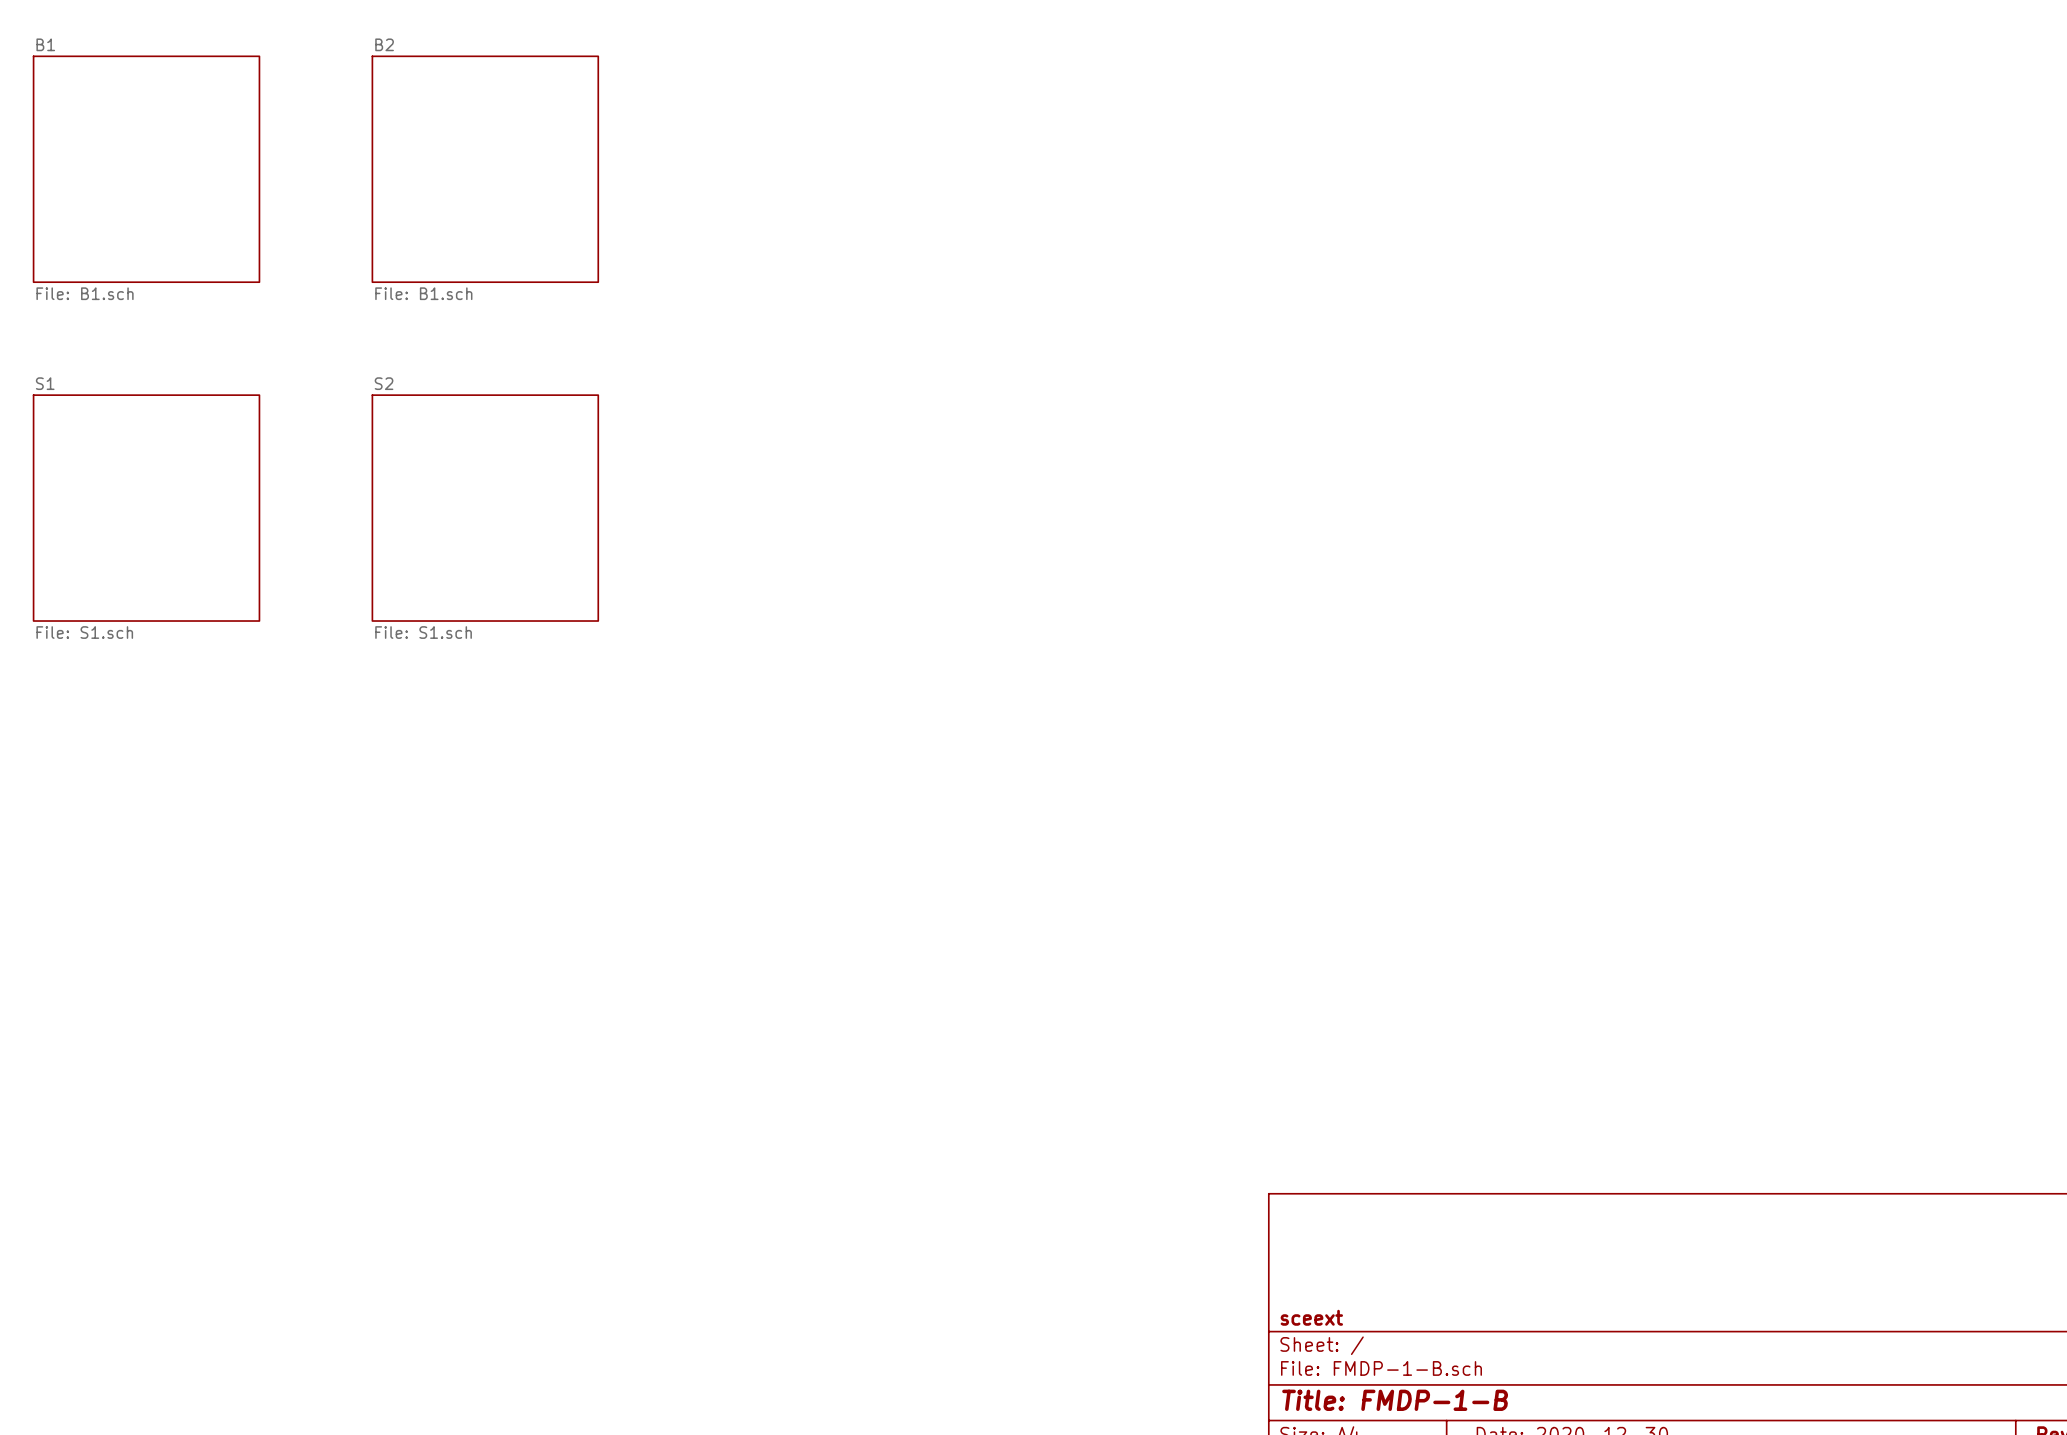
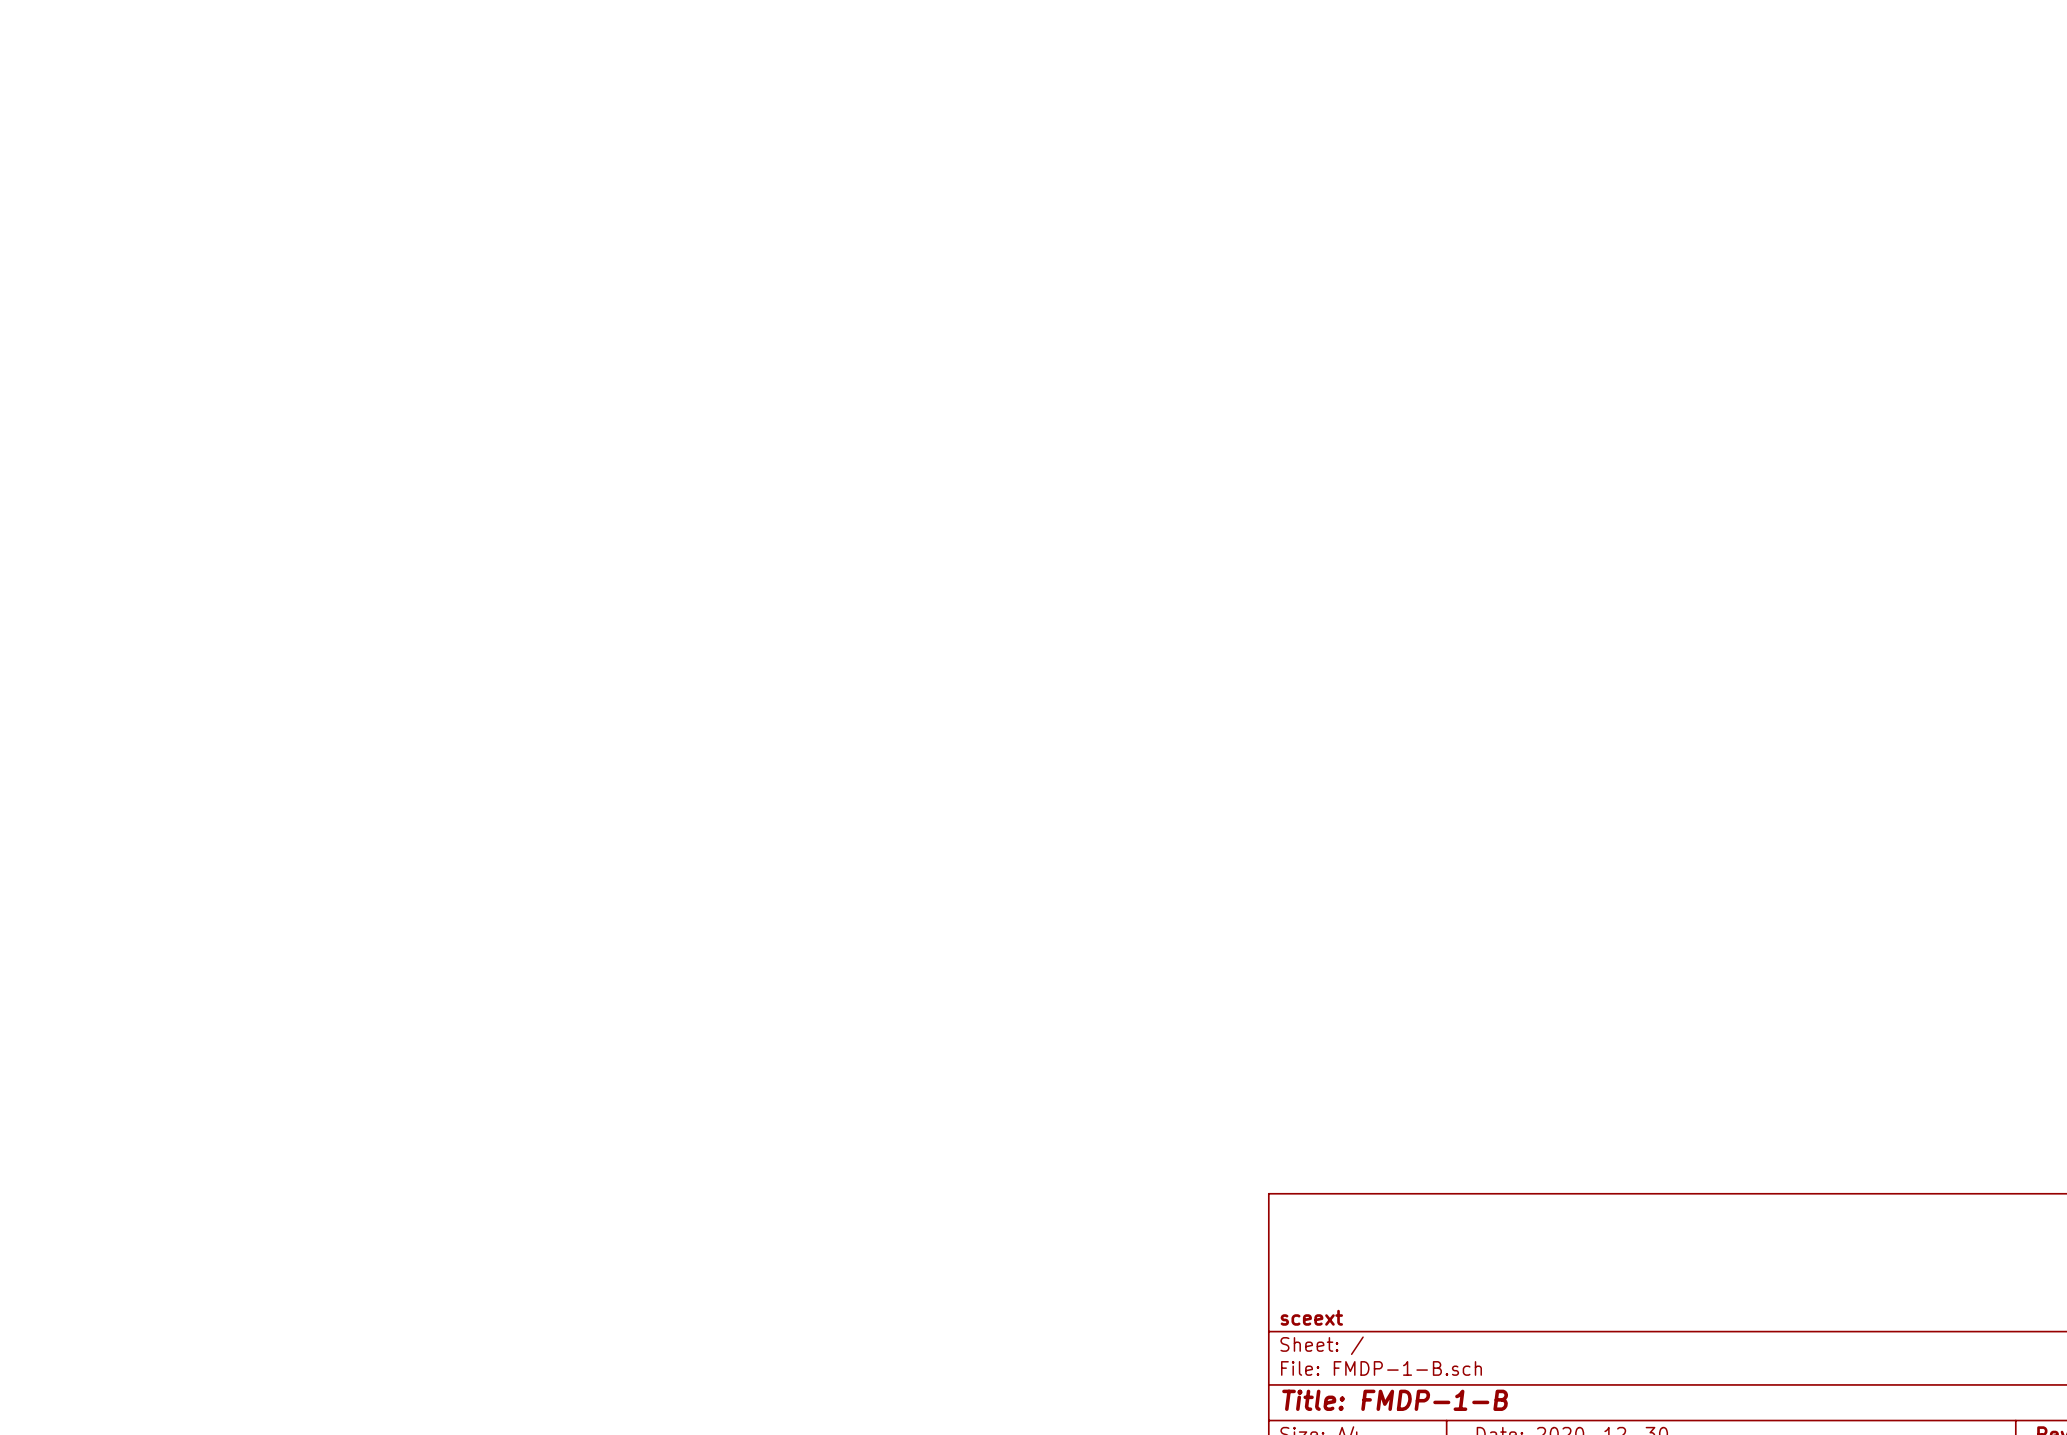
sheet B1: File: B1.sch (146, 169) -> none
sheet B2: File: B1.sch (485, 169) -> none
sheet S1: File: S1.sch (146, 508) -> none
sheet S2: File: S1.sch (485, 508) -> none

